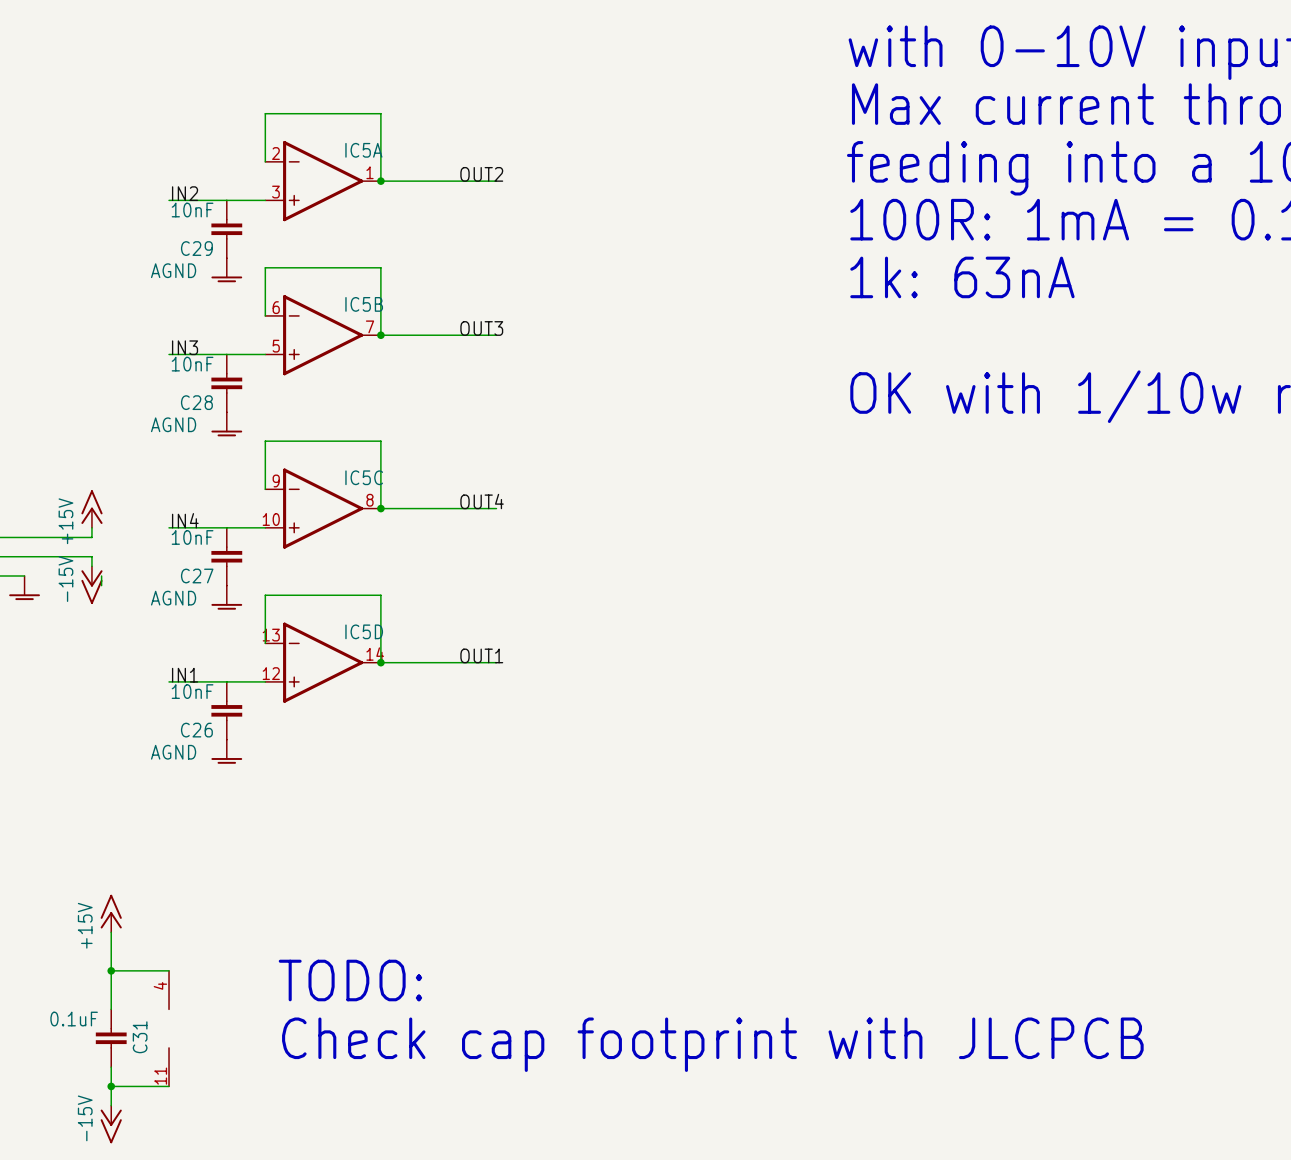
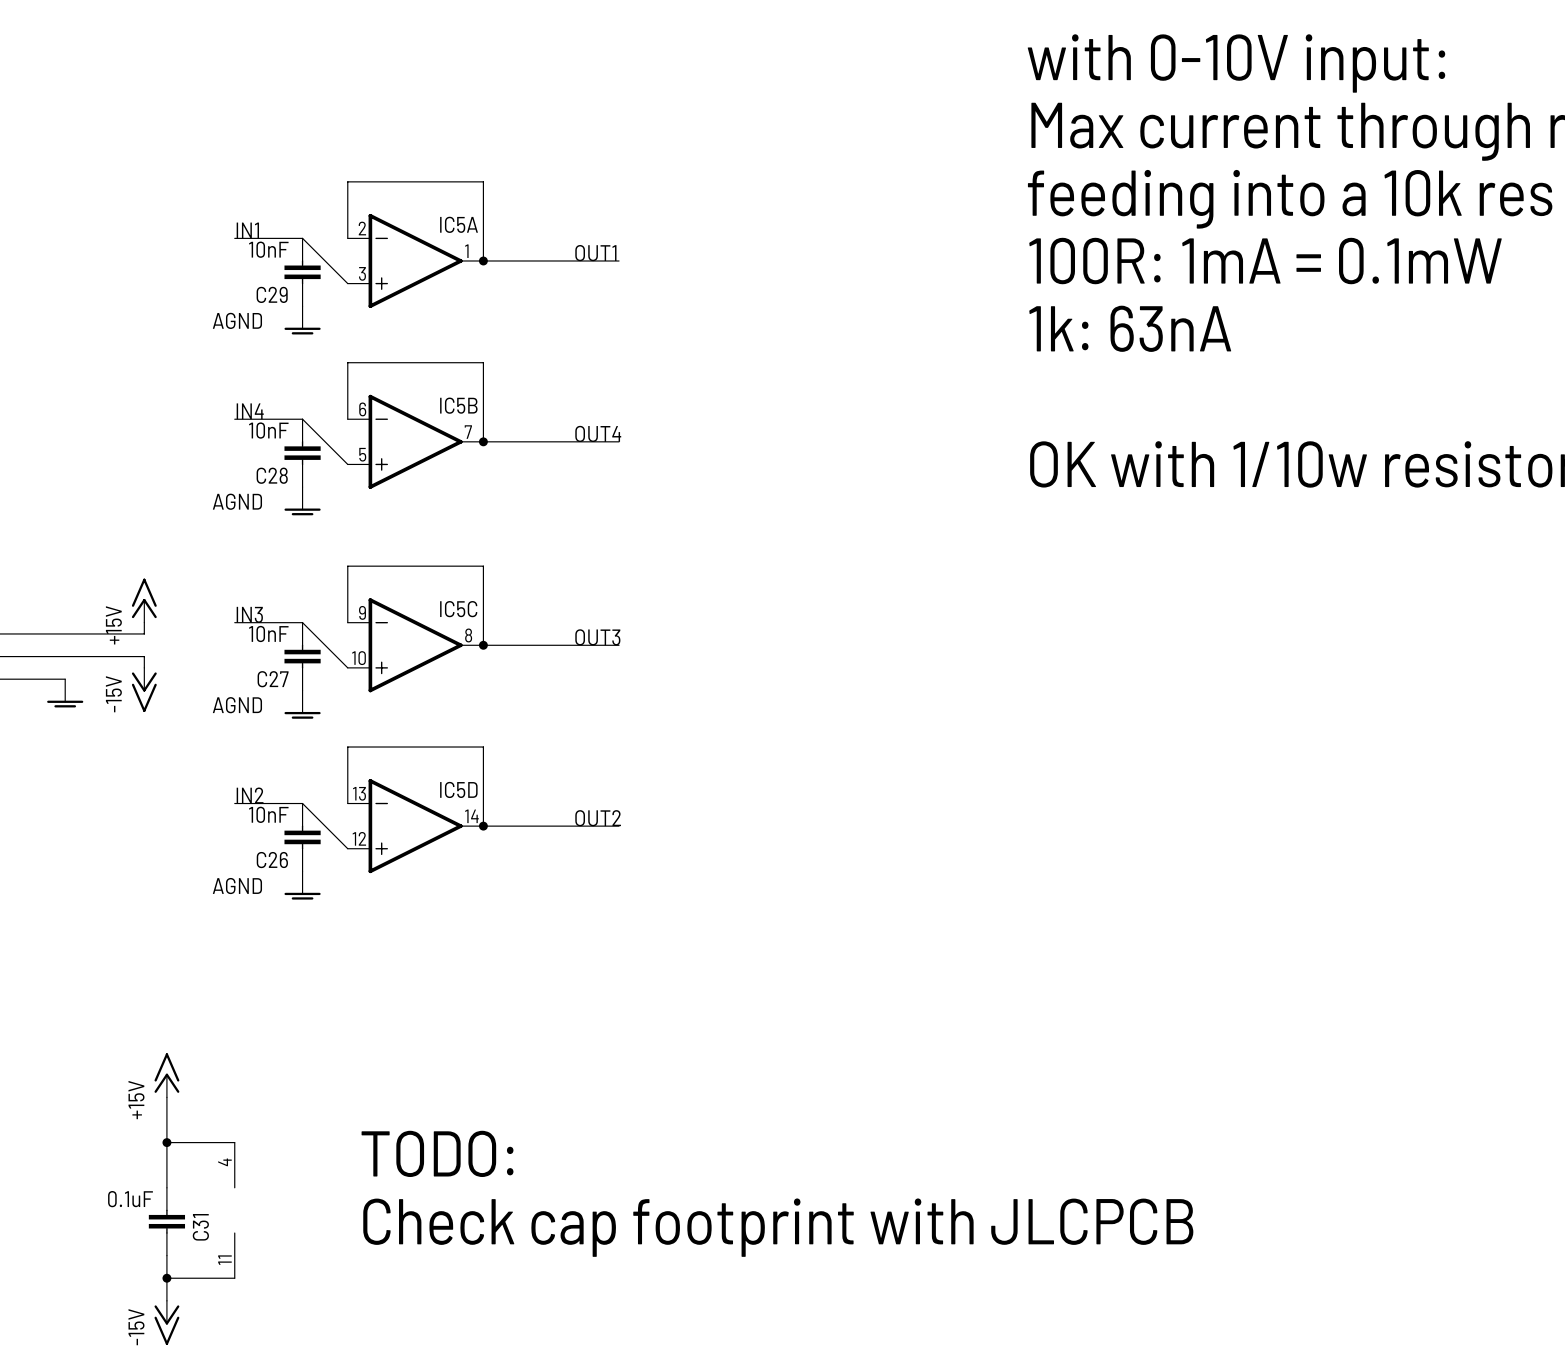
wire: (265, 152) (265, 113) (380, 113) (380, 152) -> (347, 181) (483, 181)
wire: none -> (347, 193) (347, 238)
label: OUT2 (481, 174) -> none
IC5A position: (323, 181) -> (415, 260)
wire: (380, 181) (496, 181) -> (483, 215) (483, 260) (619, 260)
junction position: (380, 181) -> (483, 260)
label: IN2 (185, 193) -> IN1 (247, 230)
wire: (226, 200) (265, 200) -> (302, 238) (347, 283)
label: none -> OUT1 (595, 253)
wire: (265, 306) (265, 267) (380, 267) (380, 306) -> (347, 362) (483, 362)
wire: none -> (347, 374) (347, 419)
label: OUT3 (481, 328) -> none
IC5B position: (323, 335) -> (415, 441)
wire: (380, 335) (496, 335) -> (483, 396) (483, 441) (619, 441)
junction position: (380, 335) -> (483, 441)
label: IN3 (185, 347) -> IN4 (250, 411)
wire: (226, 354) (265, 354) -> (302, 419) (347, 464)
wire: (265, 479) (265, 441) (380, 441) (380, 479) -> (347, 566) (483, 566)
wire: none -> (347, 577) (347, 622)
label position: OUT4 (482, 501) -> OUT4 (598, 433)
IC5C position: (323, 508) -> (415, 645)
wire: (380, 508) (496, 508) -> (483, 600) (483, 645) (619, 645)
junction position: (380, 508) -> (483, 645)
label: IN4 (185, 520) -> IN3 (249, 614)
wire: (226, 527) (265, 527) -> (302, 622) (347, 667)
label: none -> OUT3 (597, 637)
wire: (101, 576) (101, 585) -> none
wire: (265, 633) (265, 595) (380, 595) (380, 633) -> (347, 747) (483, 747)
wire: none -> (347, 758) (347, 803)
label: OUT1 (481, 655) -> none
IC5D position: (323, 662) -> (415, 826)
wire: (380, 662) (496, 662) -> (483, 780) (483, 826) (619, 826)
junction position: (380, 662) -> (483, 826)
label: IN1 (185, 675) -> IN2 (250, 795)
wire: (226, 681) (265, 681) -> (302, 803) (347, 848)
label: none -> OUT2 (598, 818)

